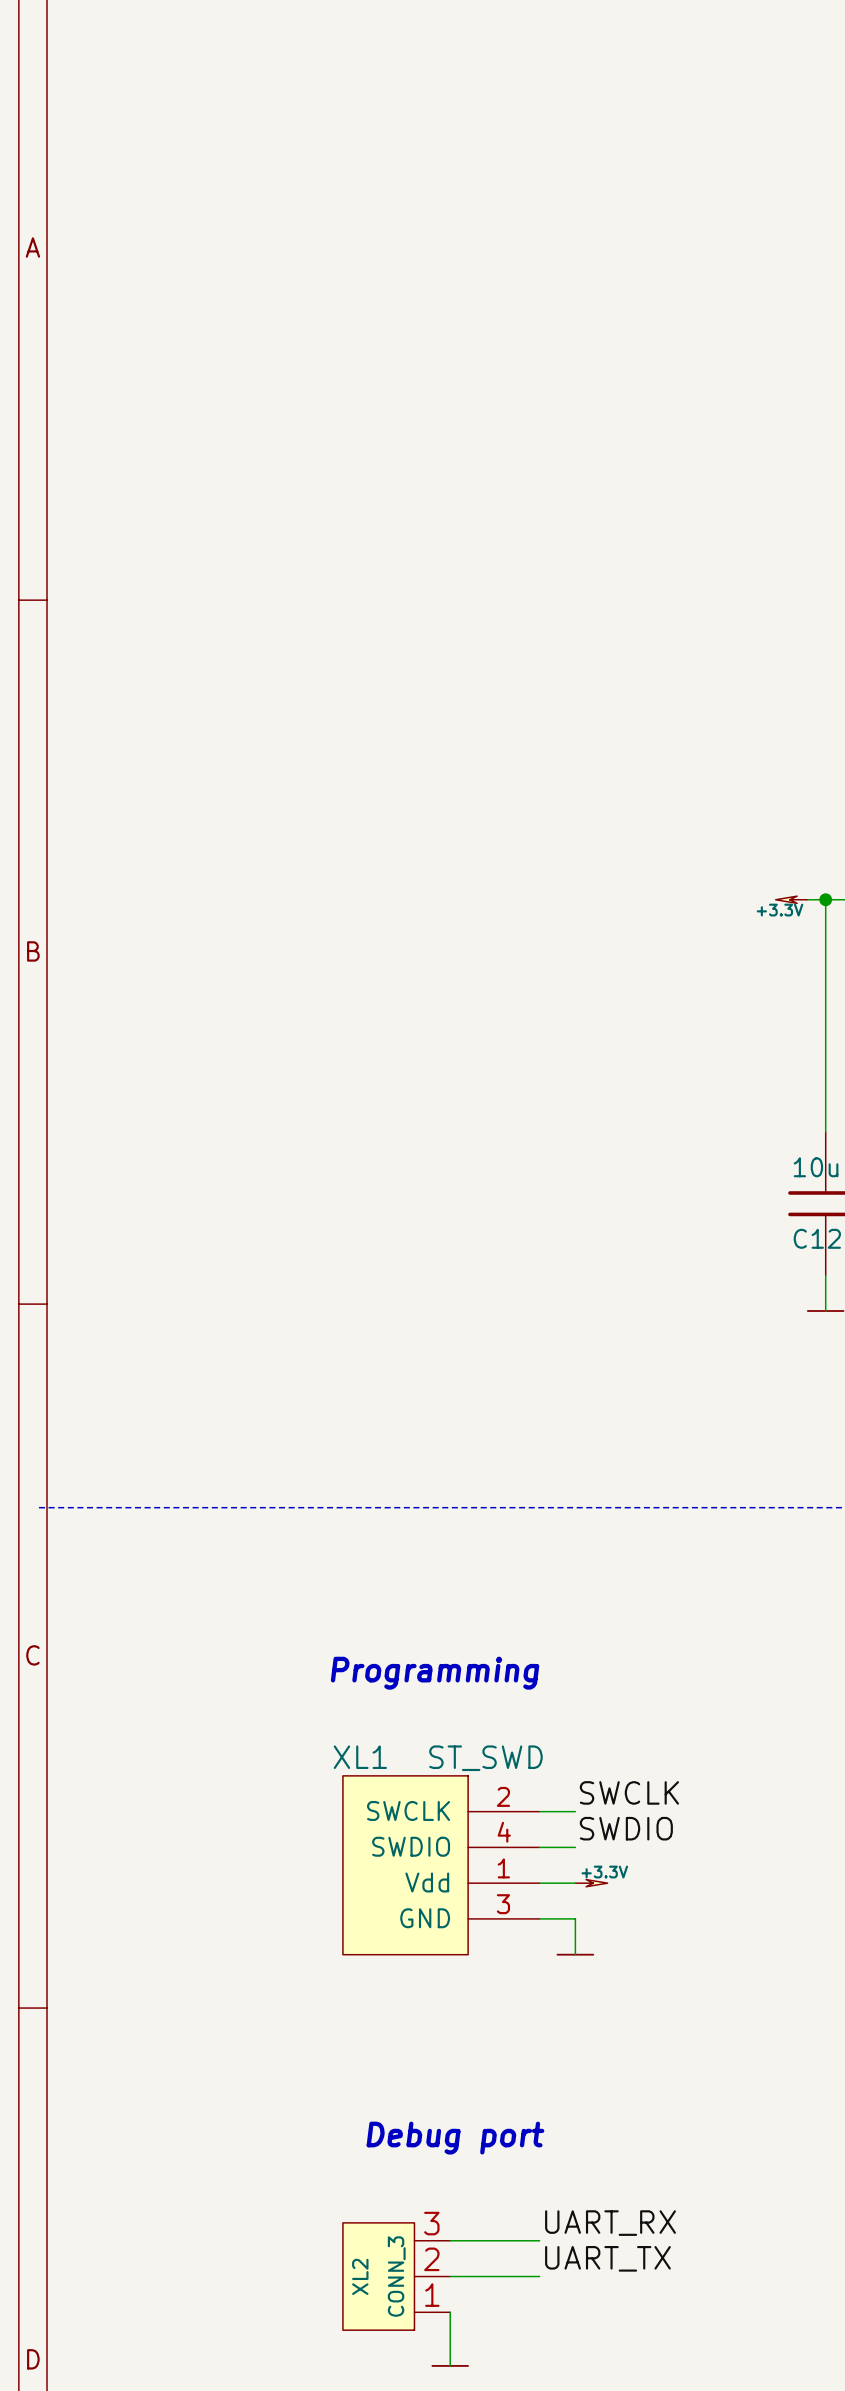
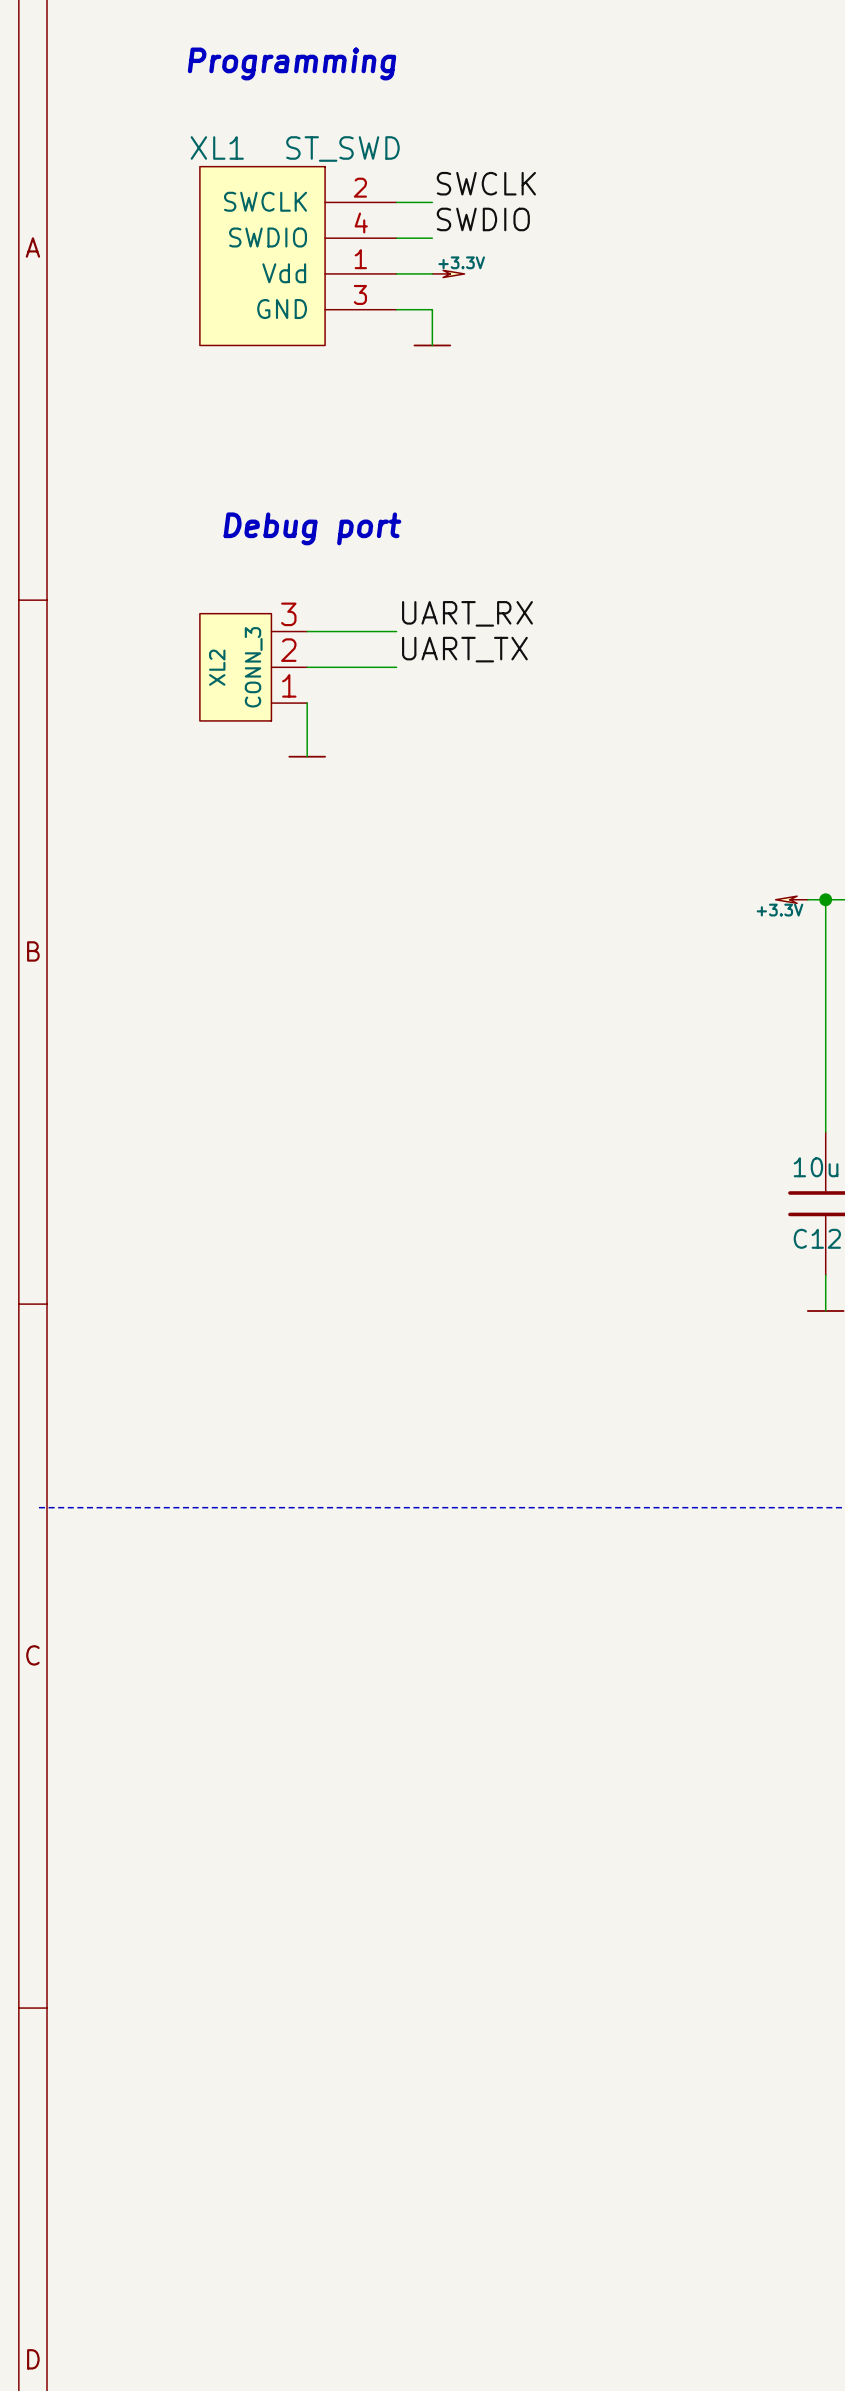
text: none -> Programming (292, 63)
label: none -> SWCLK (486, 183)
wire: none -> (396, 202) (432, 202)
label: none -> SWDIO (483, 219)
wire: none -> (396, 238) (432, 238)
wire: none -> (396, 273) (432, 273)
power symbol: none -> +3.3V (448, 273)
wire: none -> (396, 309) (432, 309) (432, 345)
power symbol: none -> (432, 345)
text: none -> Debug port (312, 528)
label: none -> UART_RX (467, 613)
wire: none -> (307, 631) (396, 631)
label: none -> UART_TX (464, 649)
wire: none -> (307, 667) (396, 667)
wire: none -> (307, 703) (307, 756)
power symbol: none -> (307, 756)
text: Programming (435, 1673) -> none
label: SWCLK (629, 1792) -> none
wire: (539, 1811) (575, 1811) -> none
label: SWDIO (626, 1828) -> none
wire: (539, 1847) (575, 1847) -> none
XL1 position: (441, 1865) -> (298, 256)
wire: (539, 1883) (575, 1883) -> none
power symbol: +3.3V (591, 1883) -> none
wire: (539, 1918) (575, 1918) (575, 1954) -> none
power symbol: (575, 1954) -> none
text: Debug port (455, 2138) -> none
label: UART_RX (610, 2223) -> none
wire: (450, 2240) (539, 2240) -> none
label: UART_TX (607, 2258) -> none
XL2 position: (396, 2276) -> (253, 667)
wire: (450, 2276) (539, 2276) -> none
wire: (450, 2312) (450, 2365) -> none
power symbol: (450, 2365) -> none

